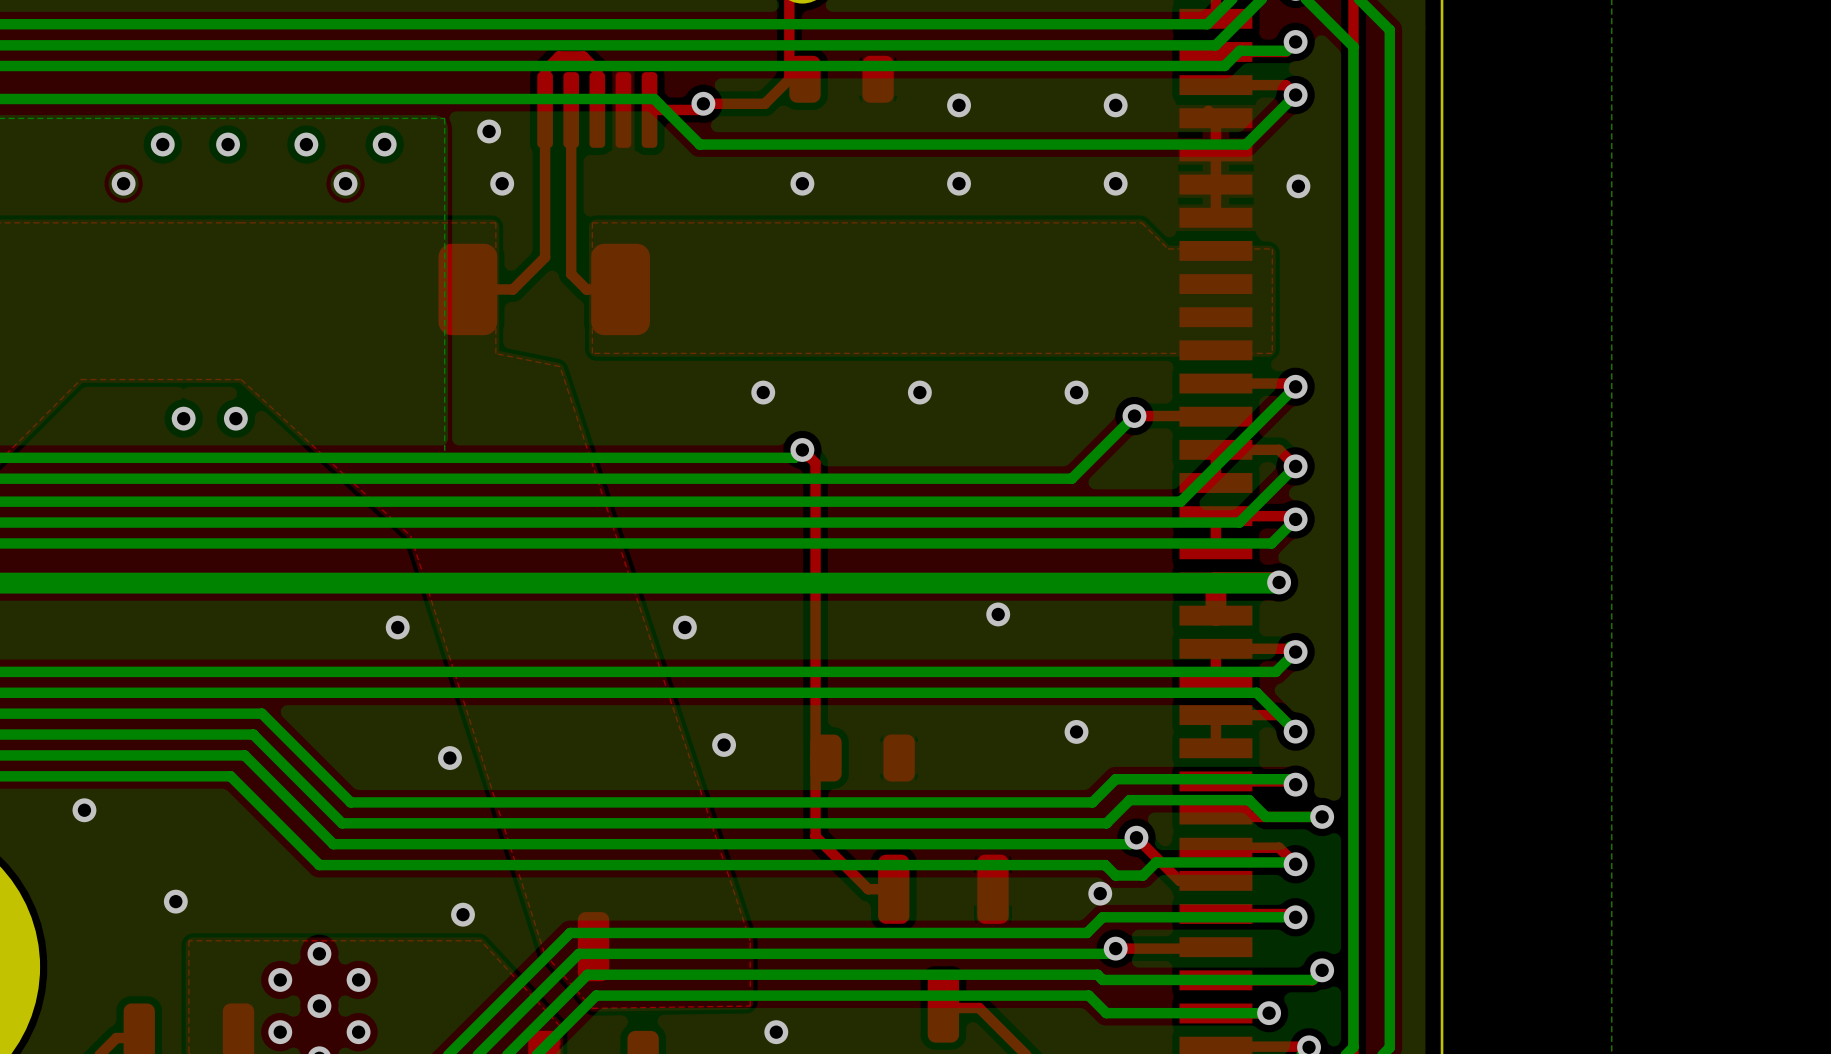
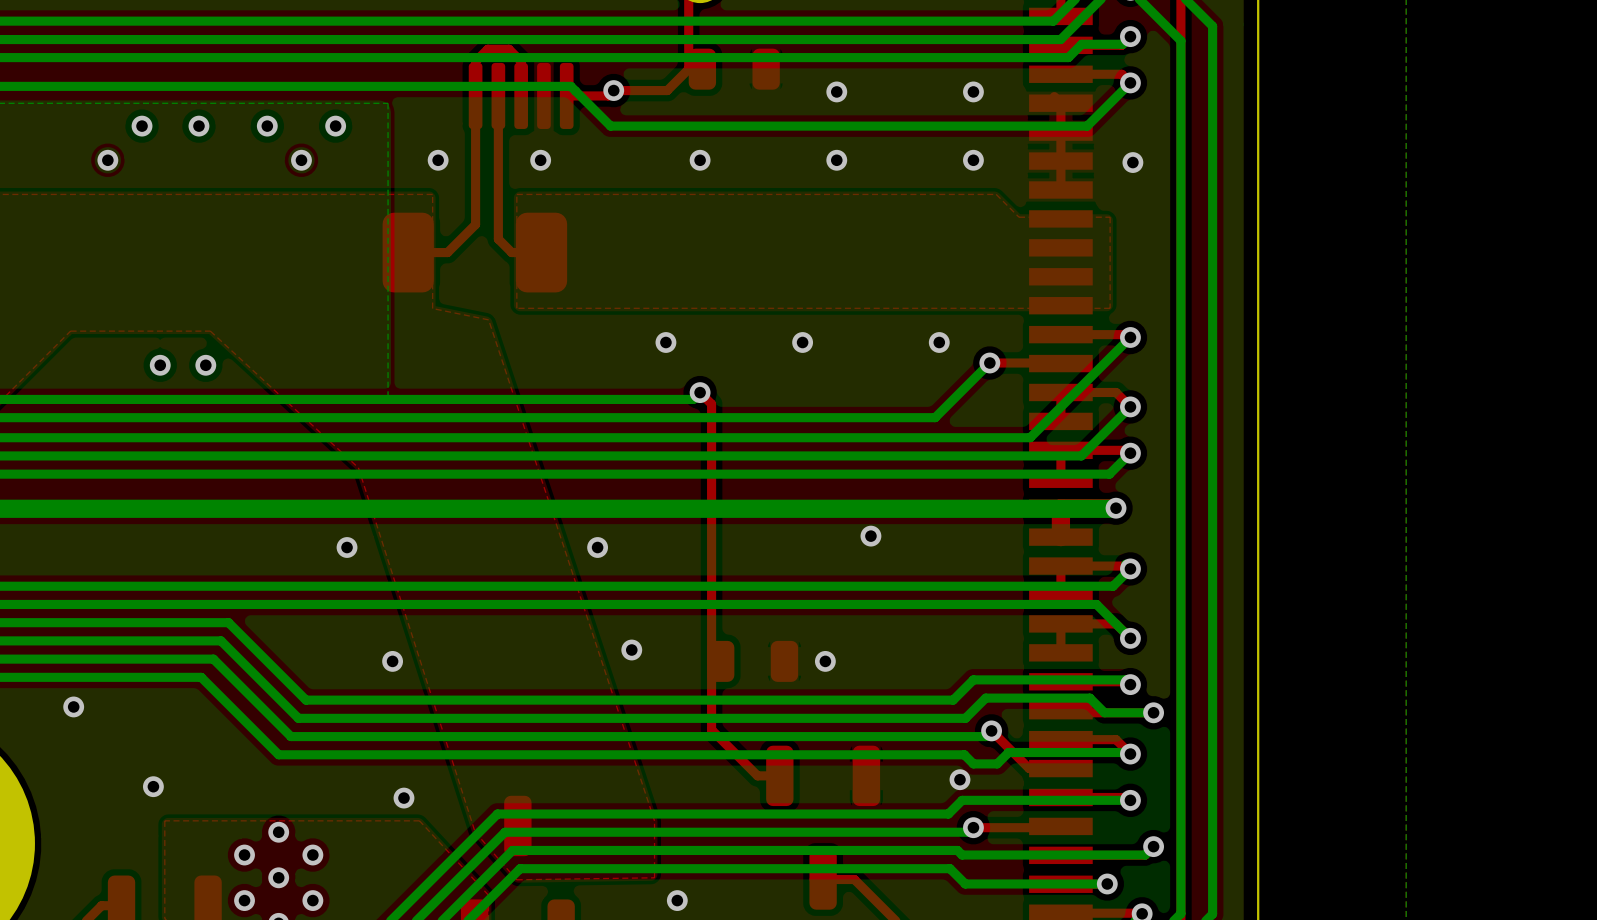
via position: (489, 131) -> (540, 160)
via position: (1076, 731) -> (825, 661)

